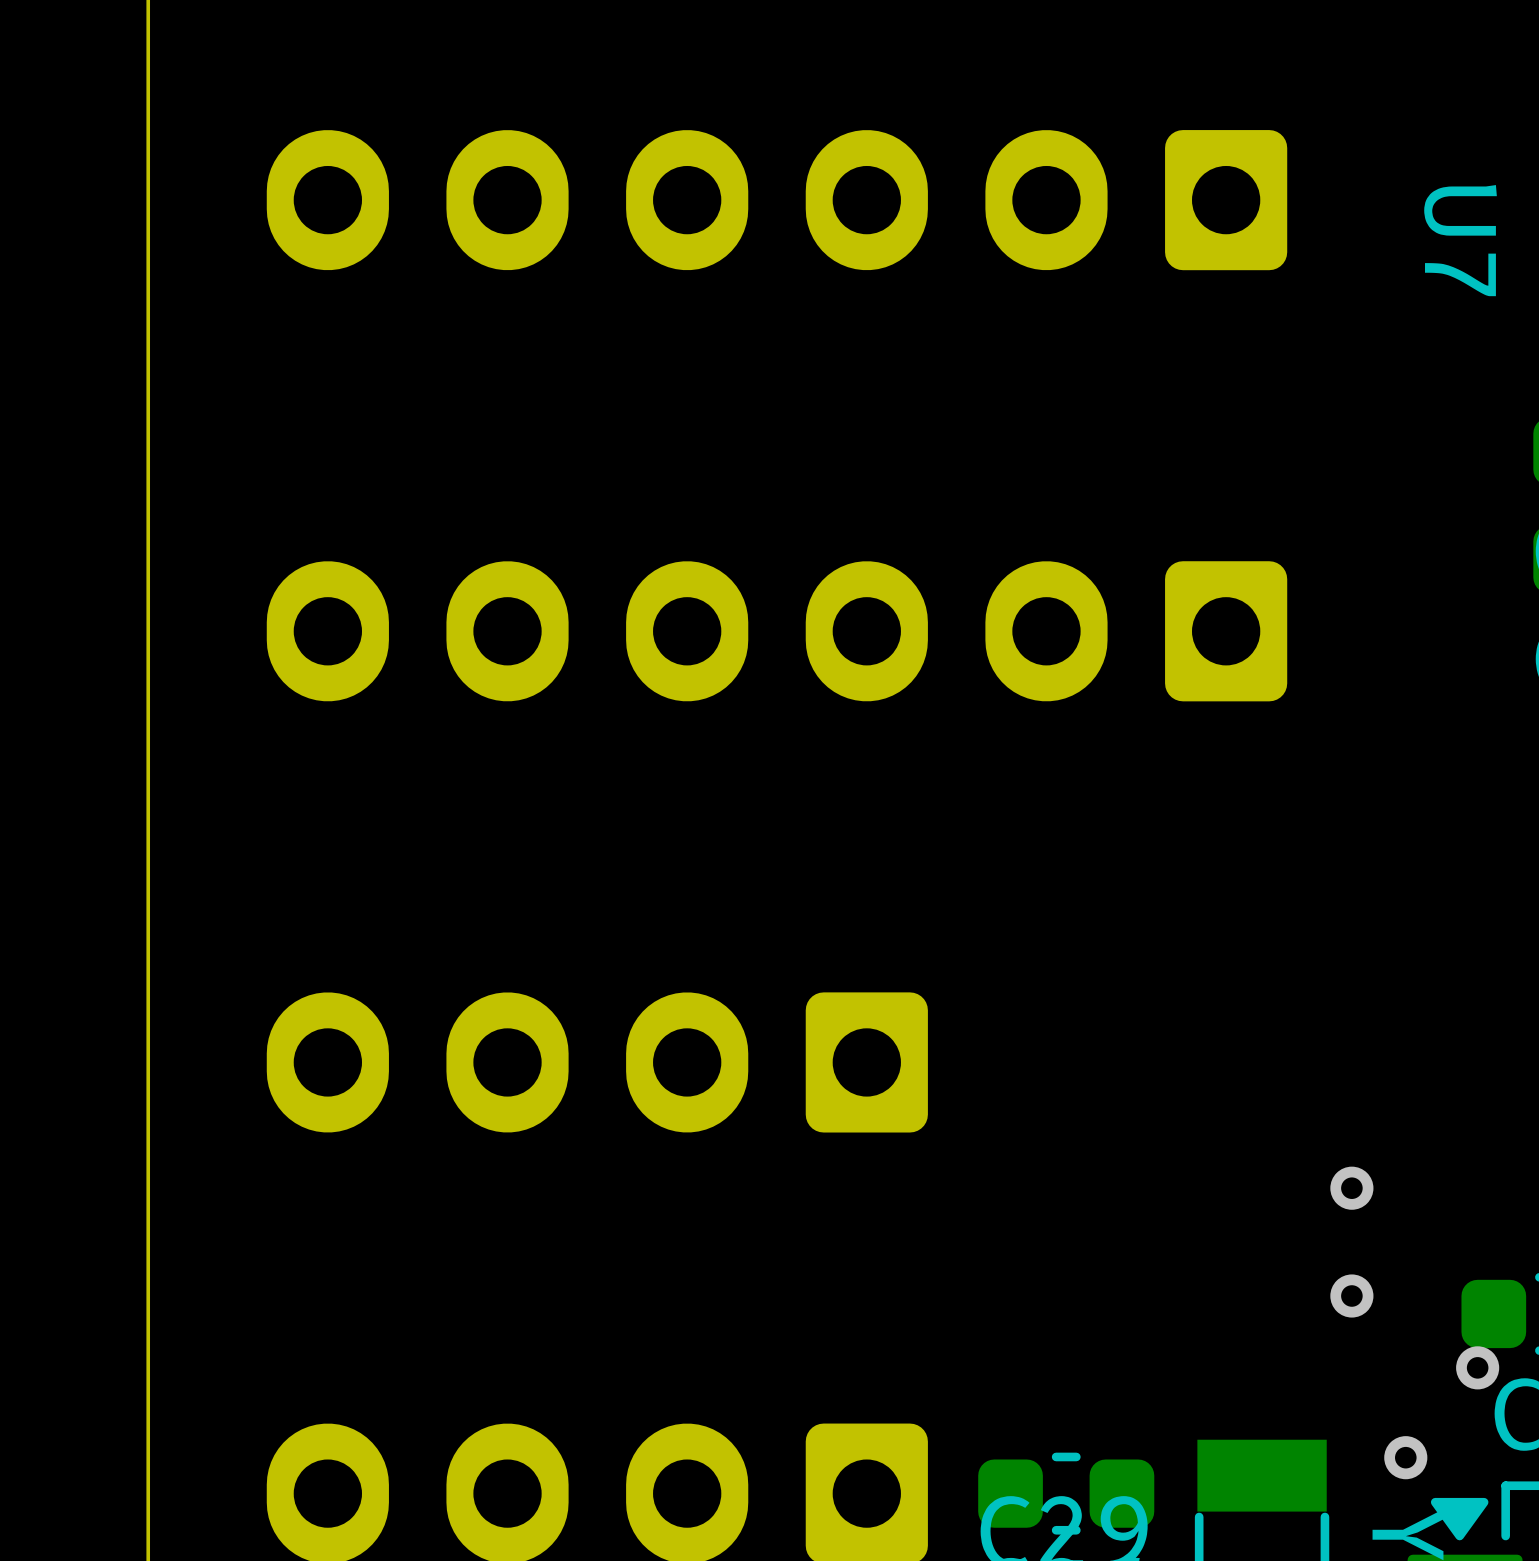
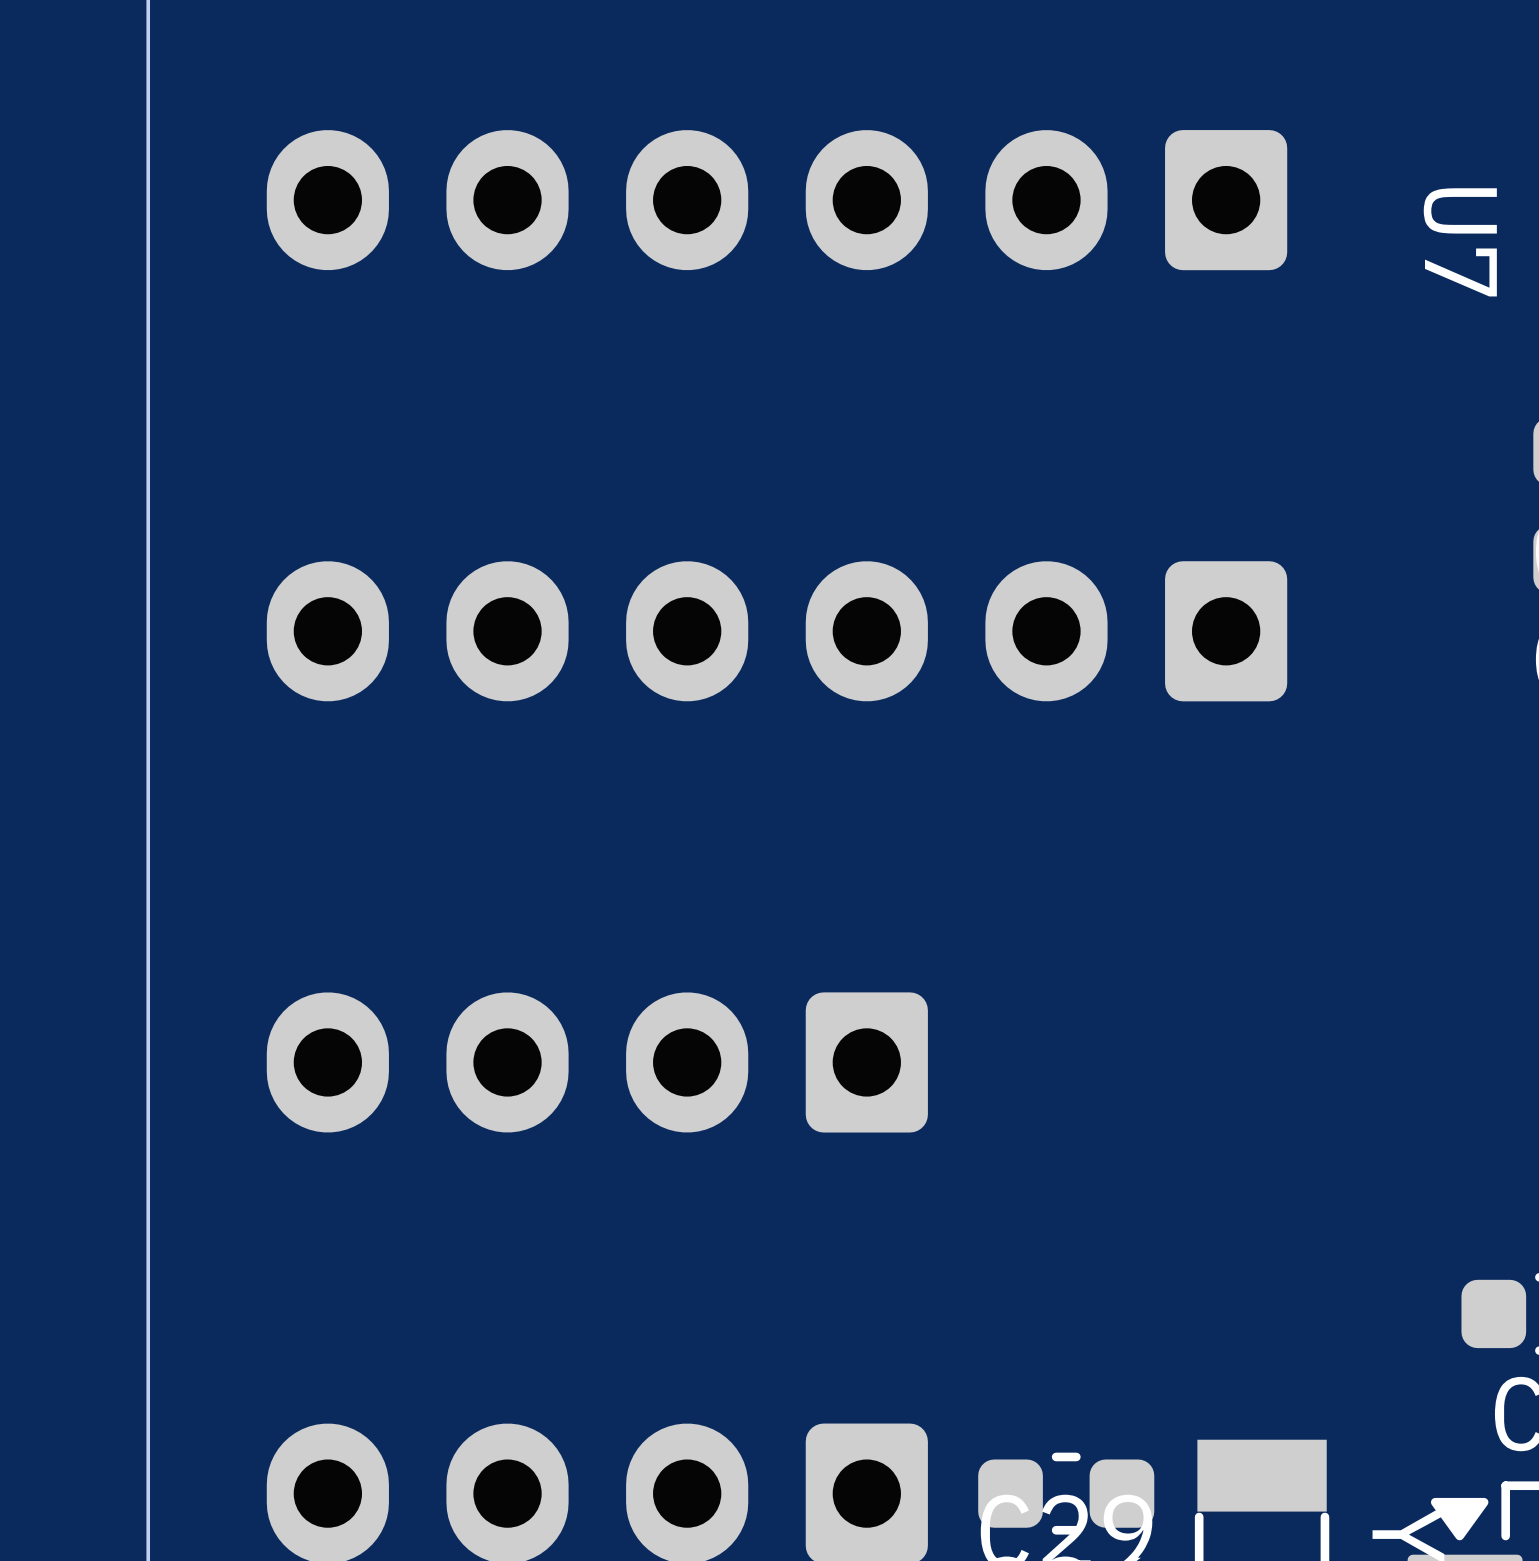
via: (1351, 1188) -> none
via: (1351, 1296) -> none
via: (1477, 1367) -> none
via: (1405, 1457) -> none

